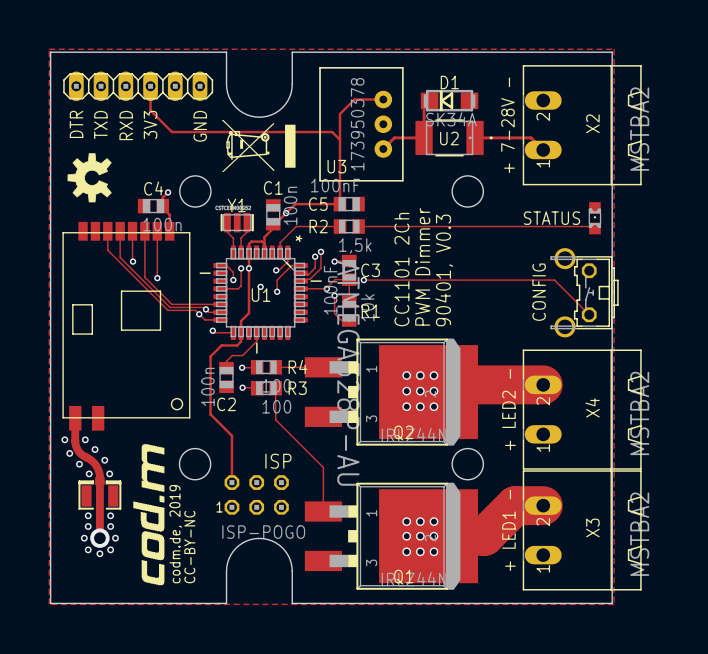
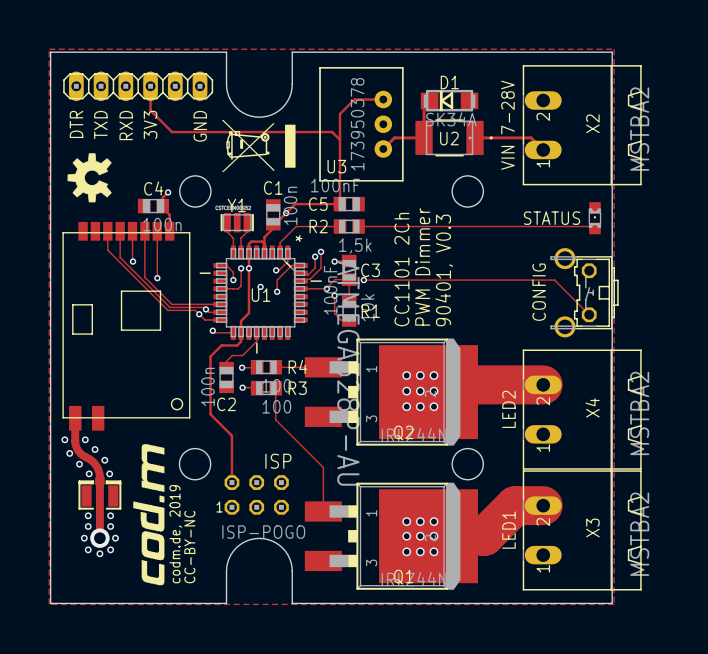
text: + 7-28V - (507, 125) -> VIN 7-28V (507, 125)
text: + LED2 - (508, 409) -> LED2 (508, 409)
text: + LED1 - (508, 530) -> LED1 (508, 530)

